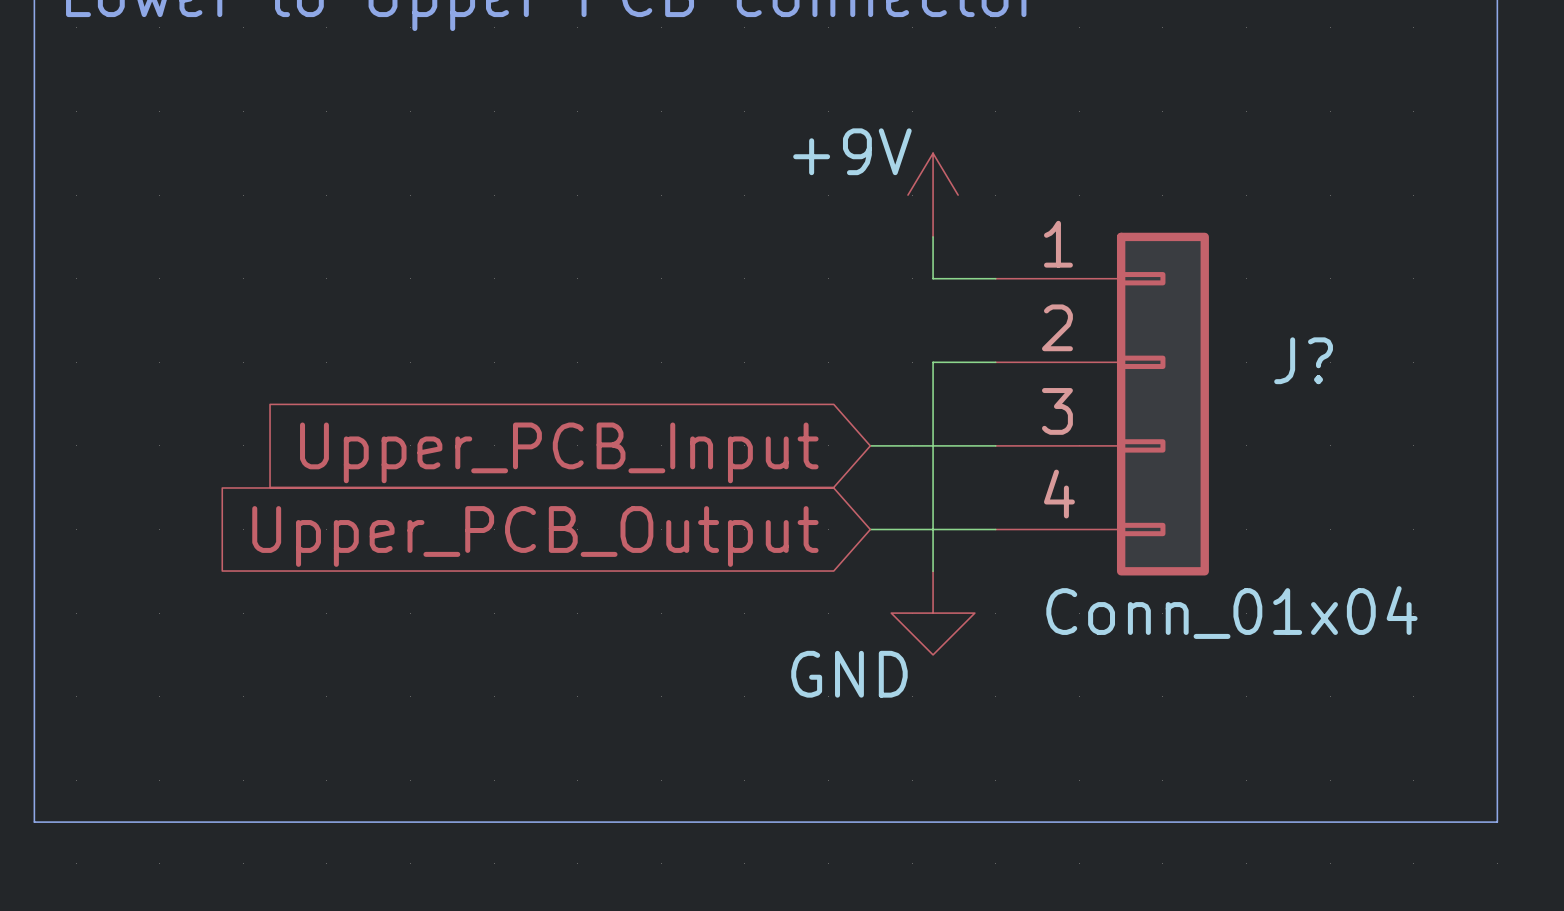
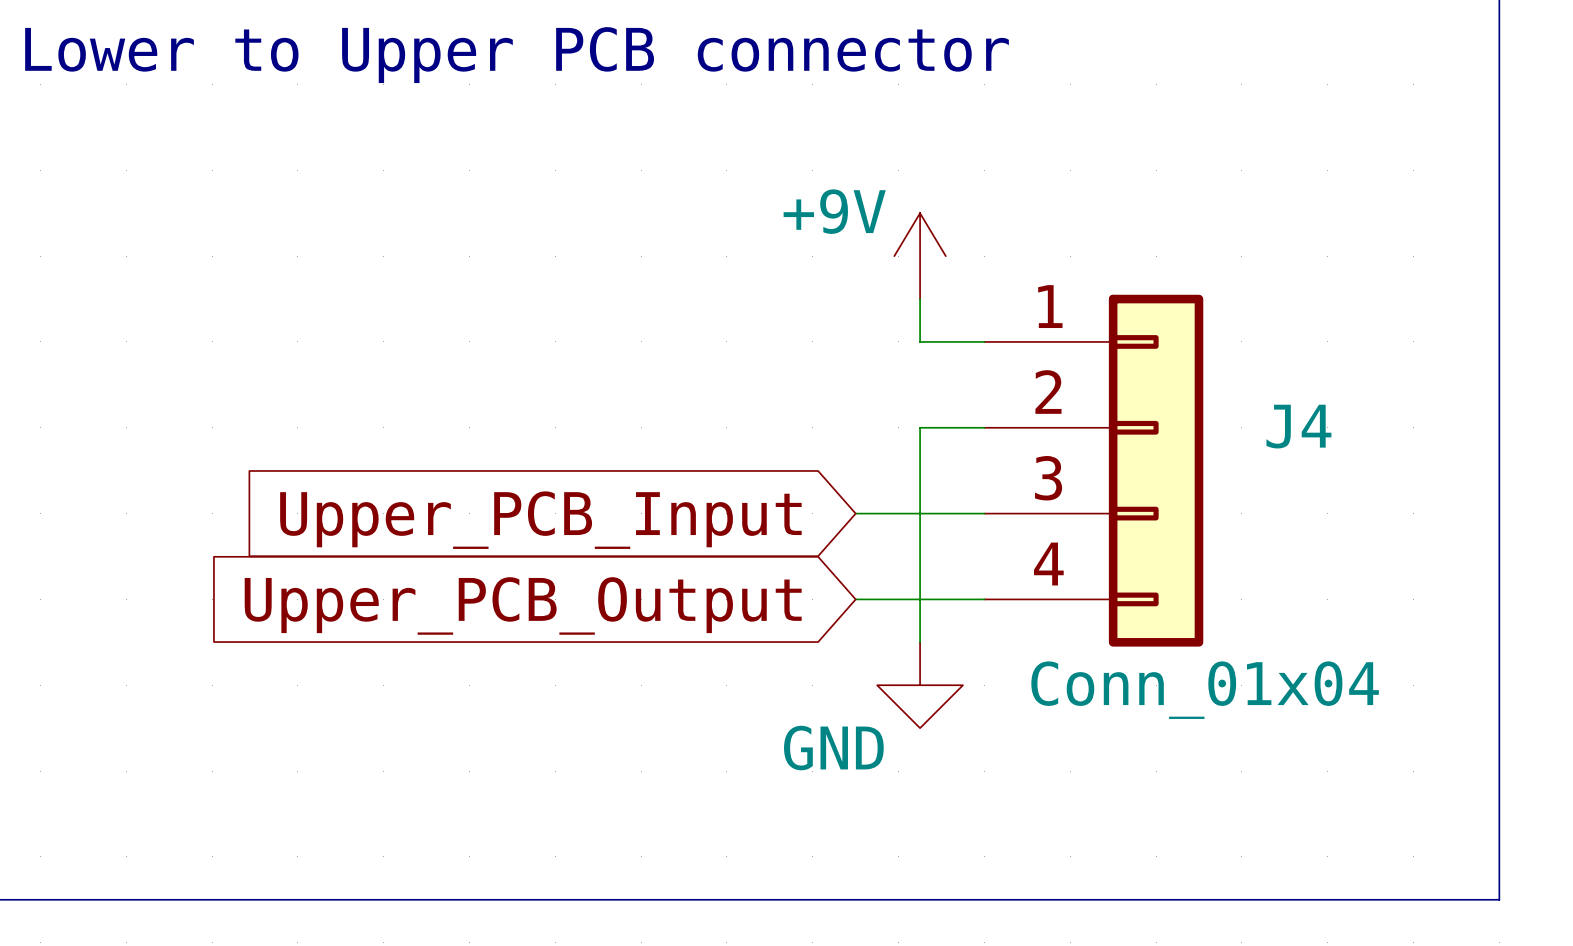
J? name: J? (1303, 360) -> J4 (1298, 426)

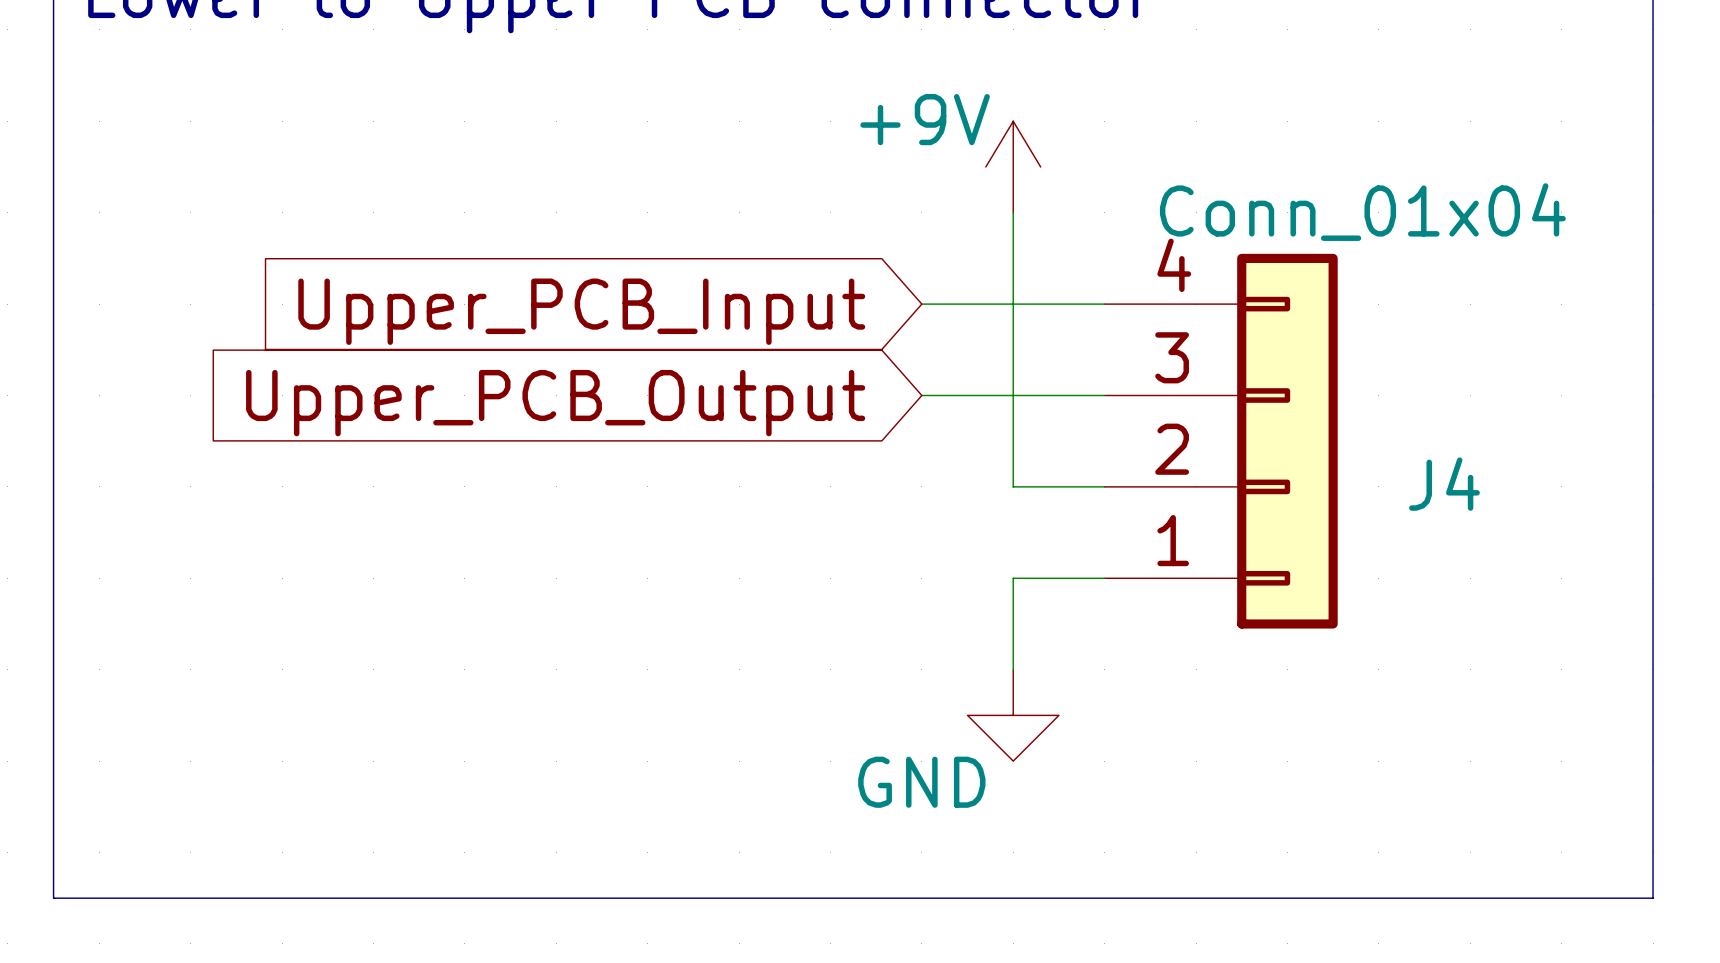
power symbol position: +9V (920, 256) -> +9V (1013, 167)
wire: (920, 299) (920, 341) -> (921, 304) (1036, 304)
wire: (920, 427) (920, 642) -> (1036, 395) (921, 395)
J4 flip: as is (1156, 470) -> up-down (1287, 441)
wire: (855, 513) (898, 513) -> (1013, 212) (1013, 486)
global label position: Upper_PCB_Input (540, 520) -> Upper_PCB_Input (581, 311)
wire: (855, 599) (898, 599) -> (1013, 669) (1013, 578)
global label position: Upper_PCB_Output (523, 605) -> Upper_PCB_Output (555, 403)
power symbol position: GND (920, 685) -> GND (1013, 715)

